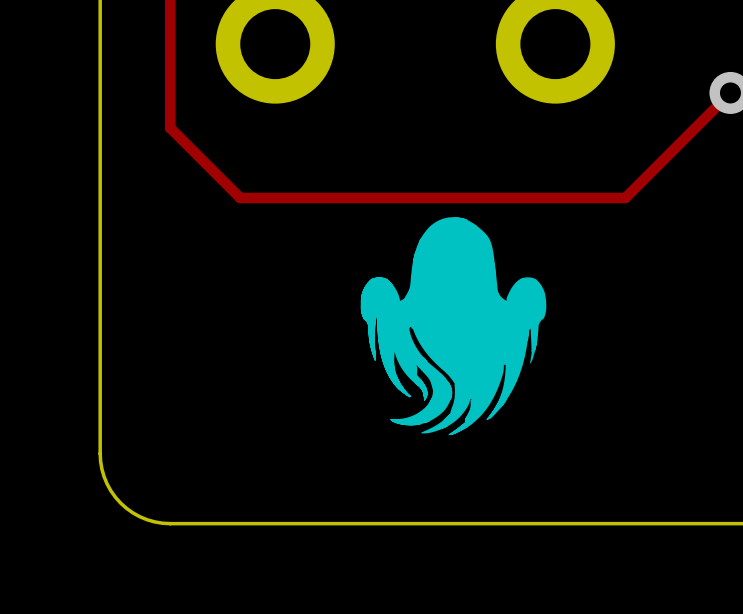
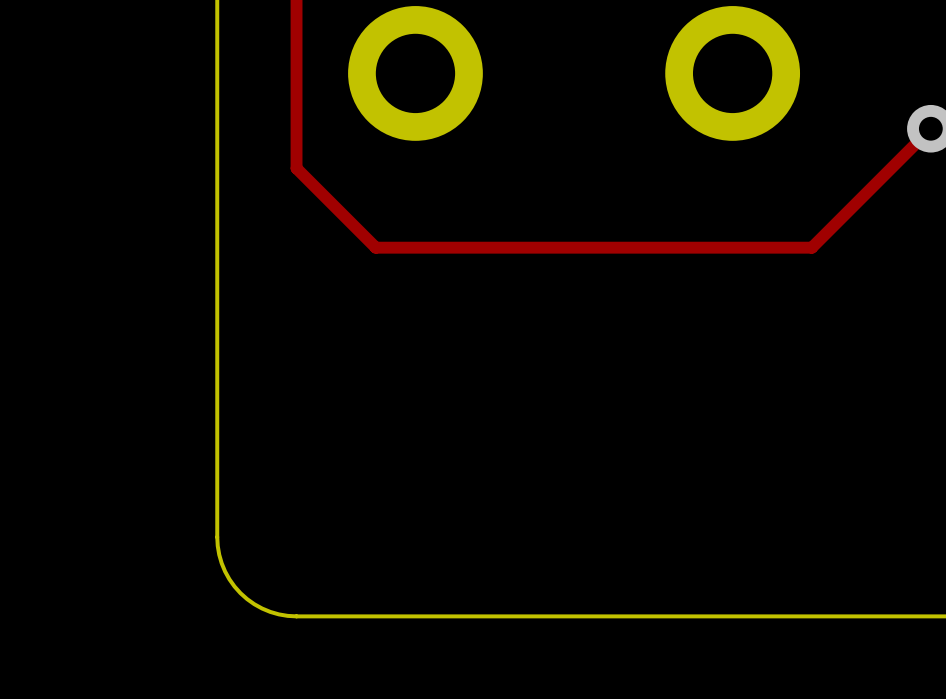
drawing: [360, 217, 547, 436] -> none

